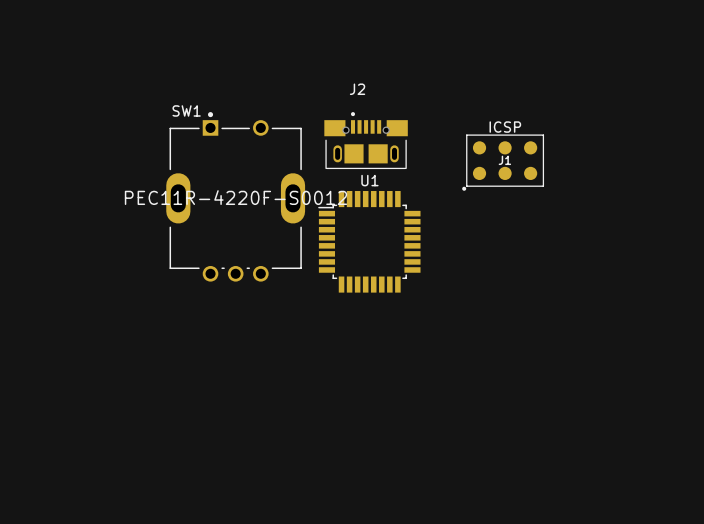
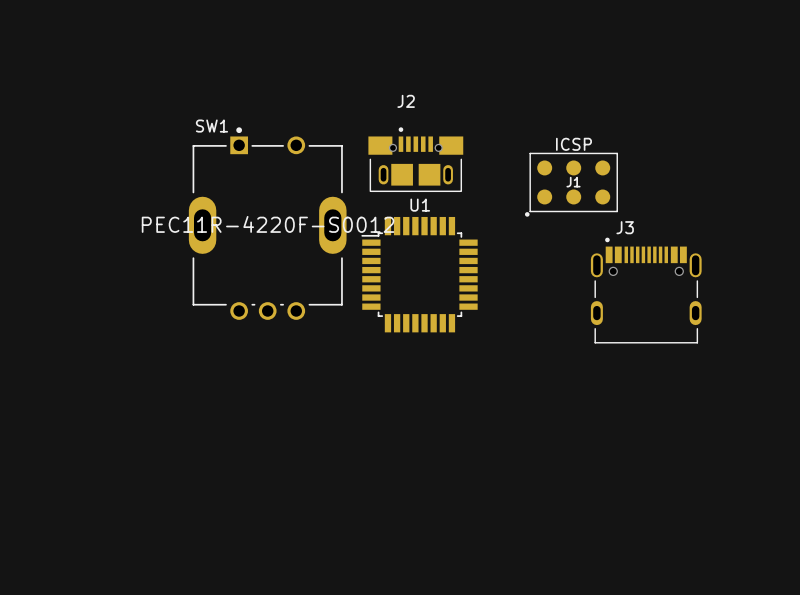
J3: none -> (646, 290)

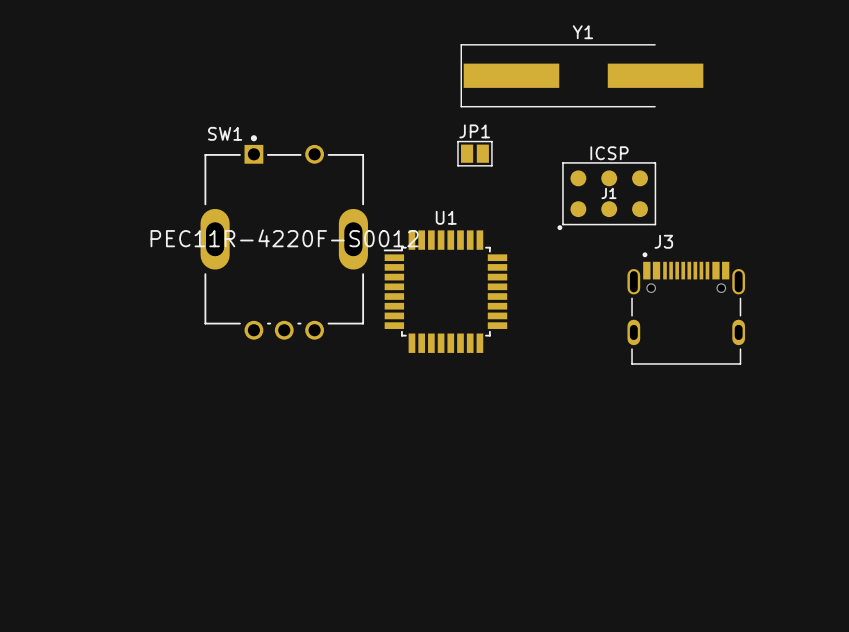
Y1: none -> (581, 75)
JP1: none -> (474, 153)
J2: (415, 159) -> none

